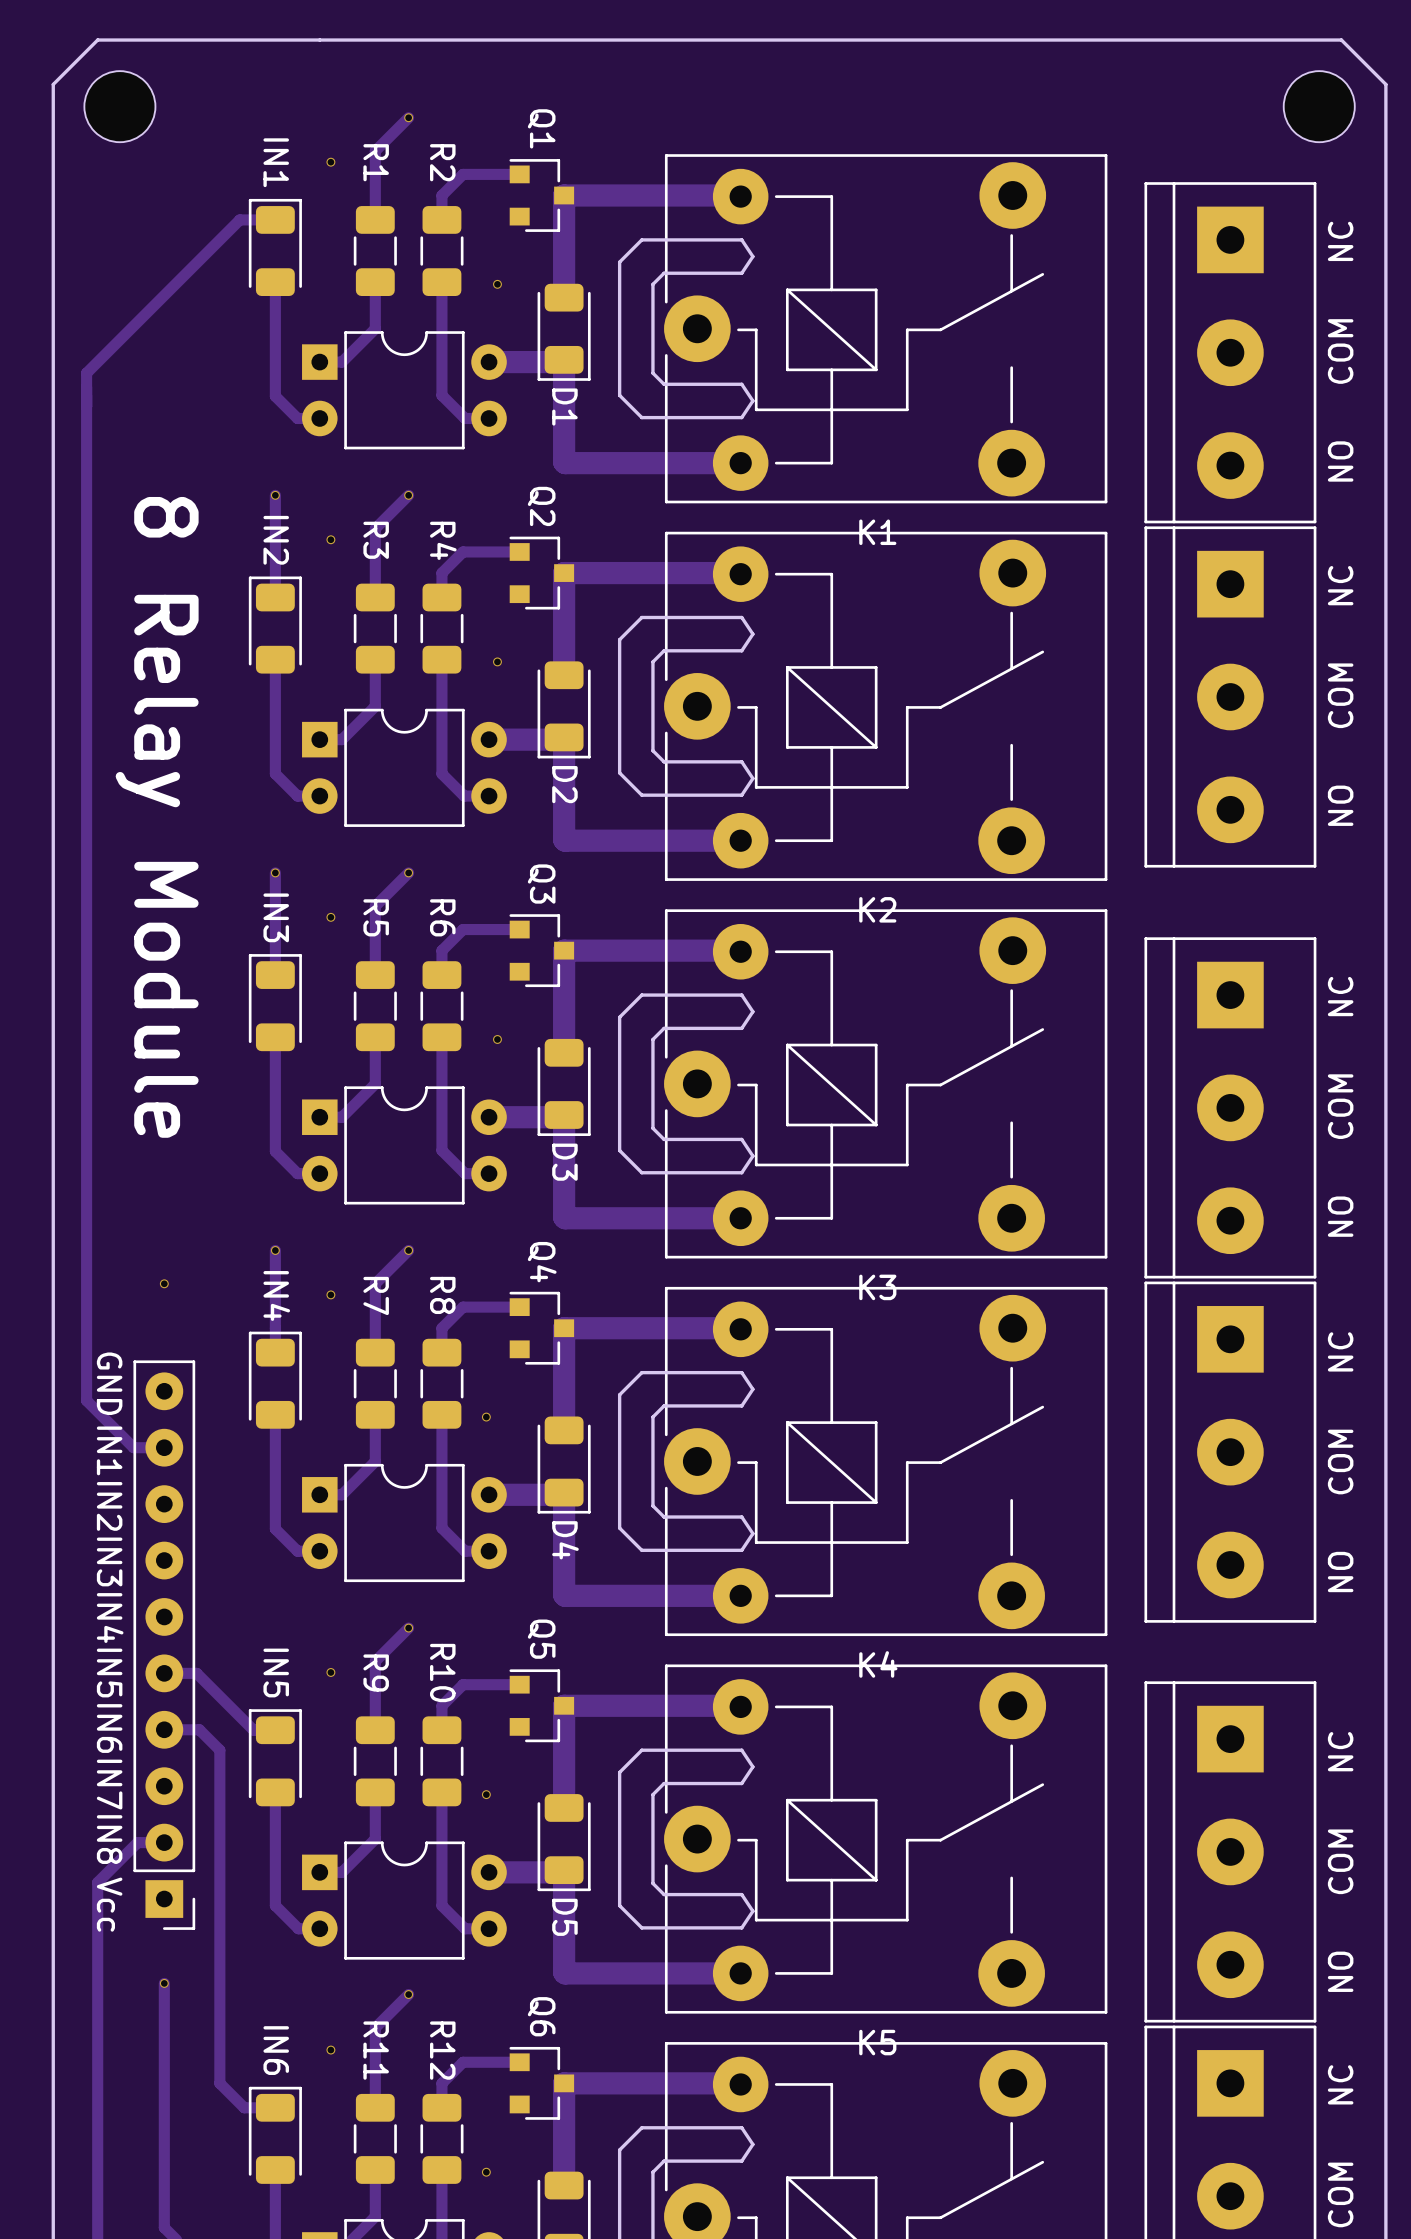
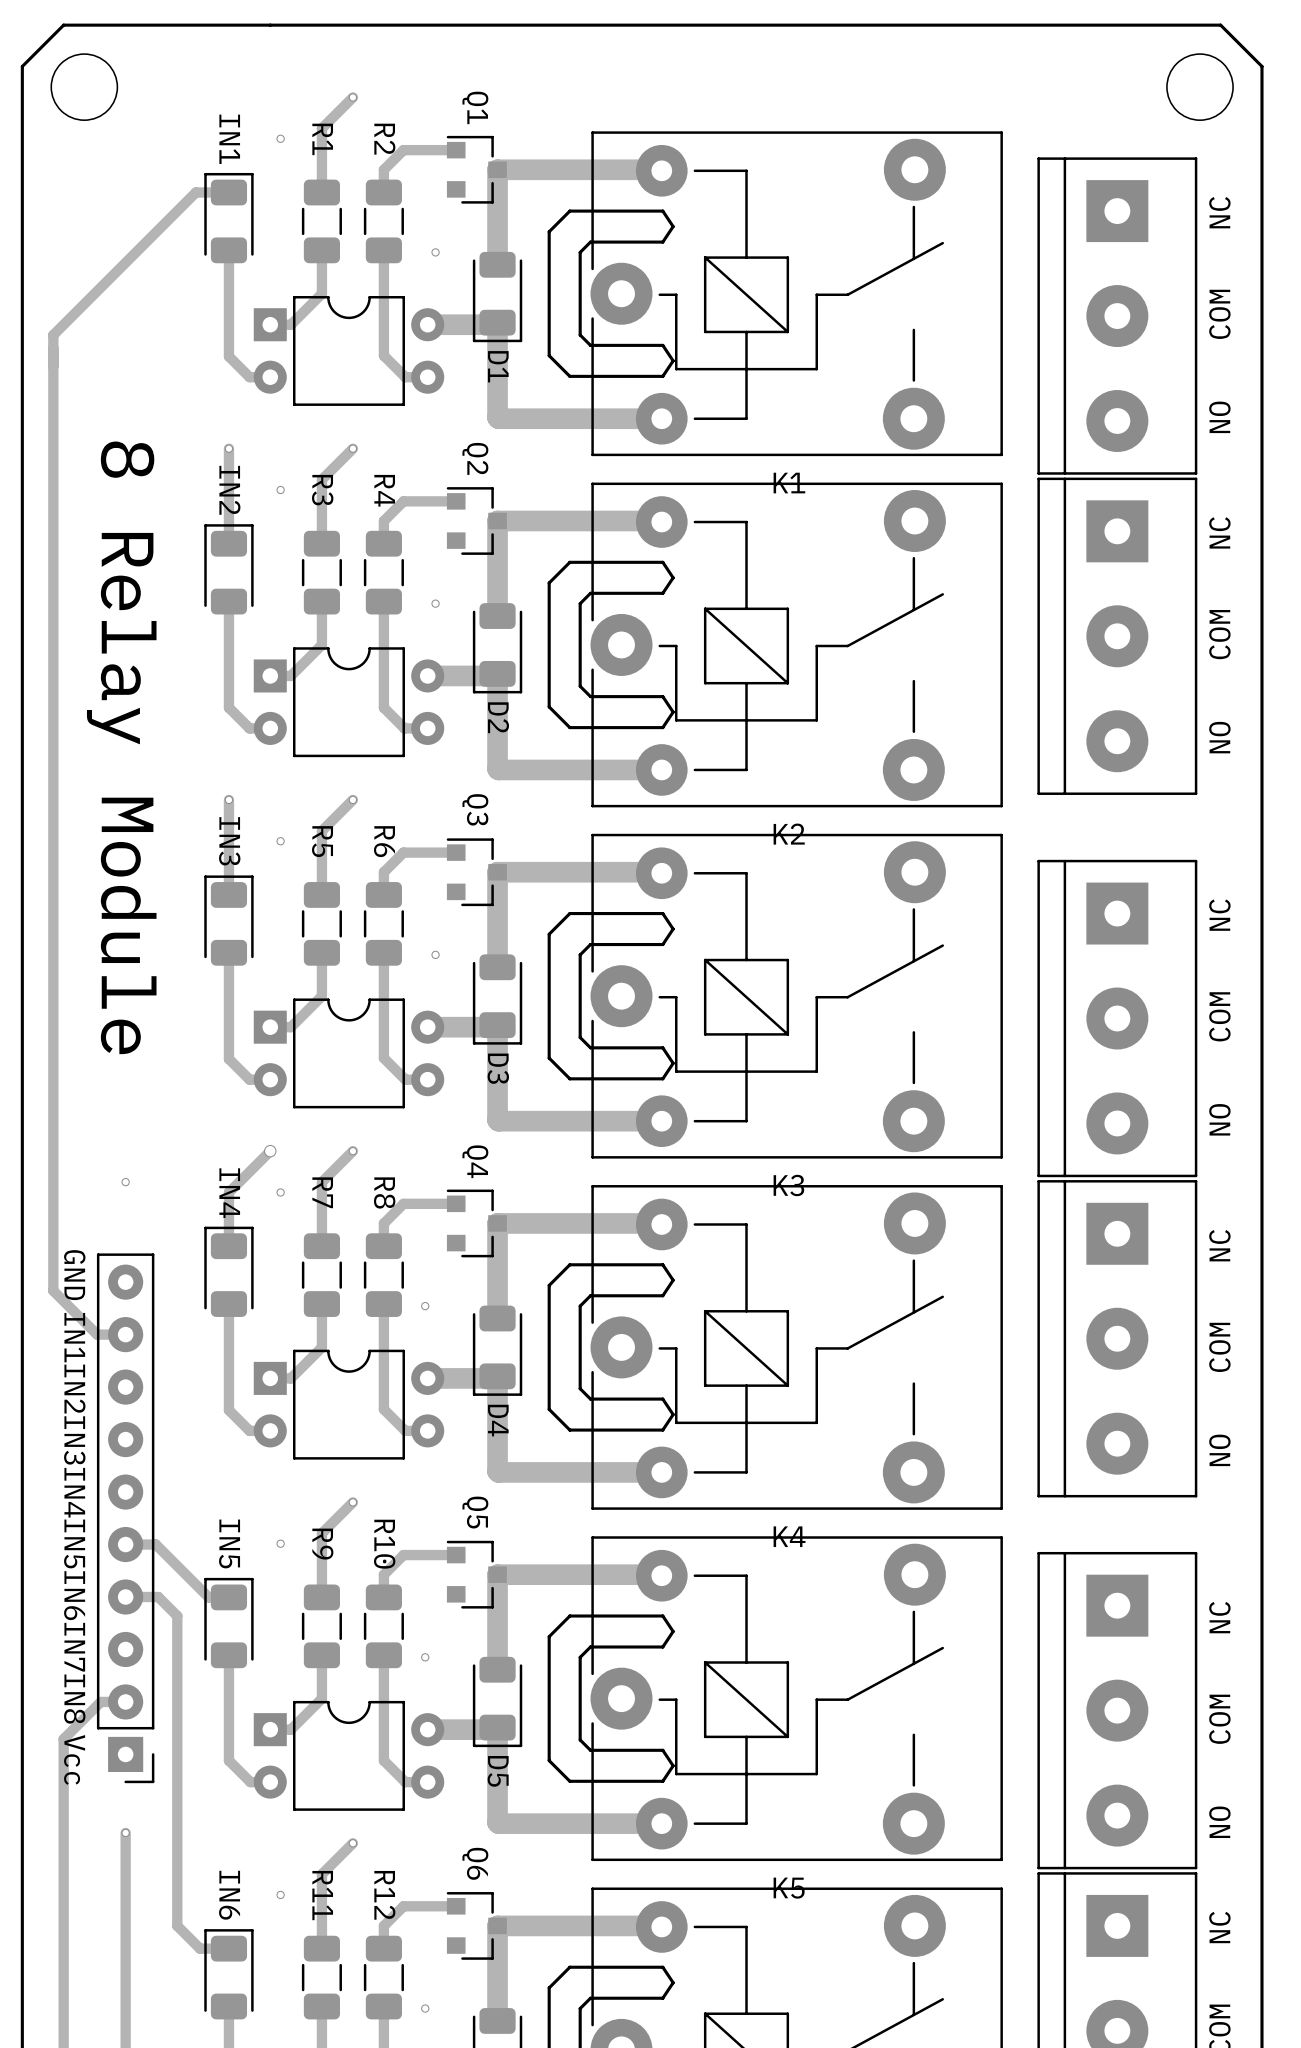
track: (275, 1250) (275, 1294) -> (270, 1151) (228, 1192)
via: (275, 1250) -> none
via: none -> (270, 1151)

